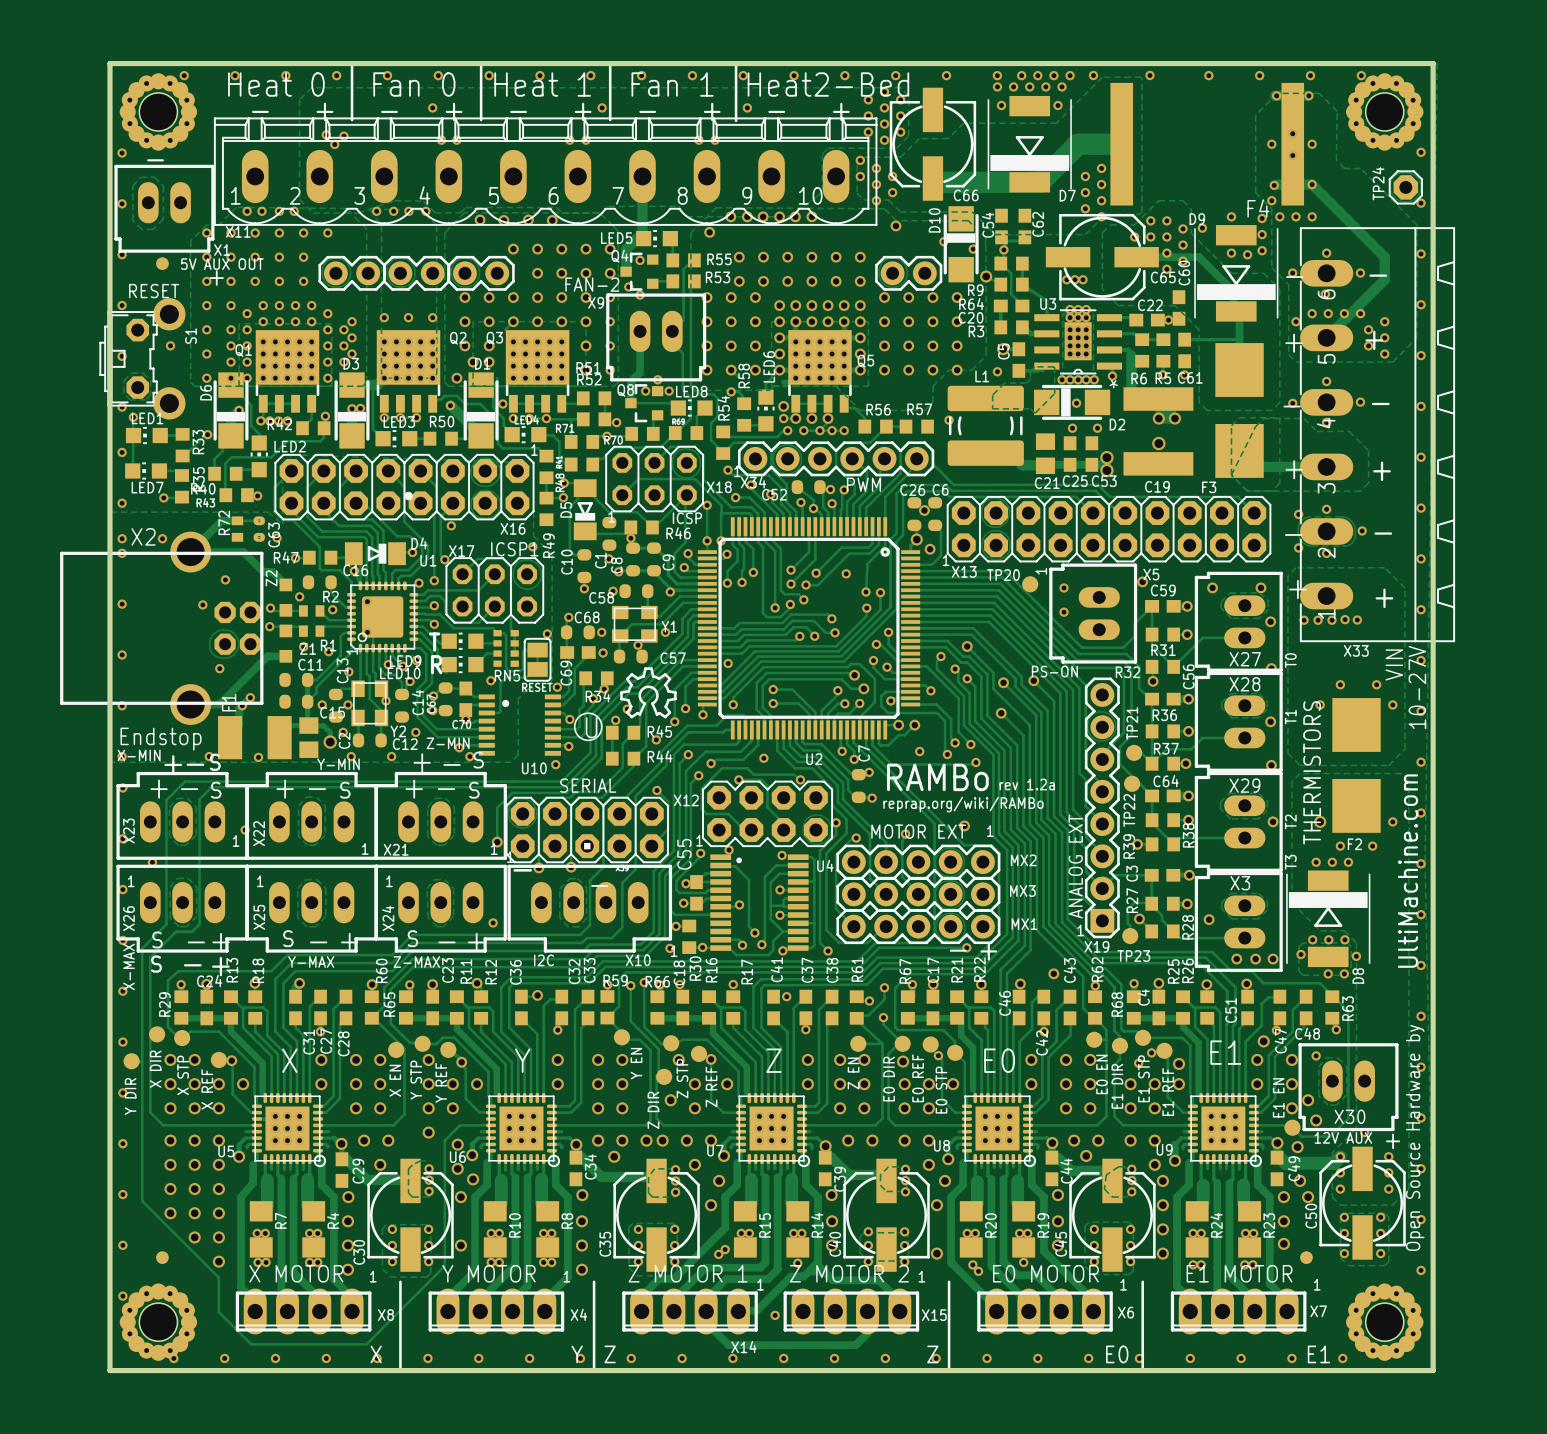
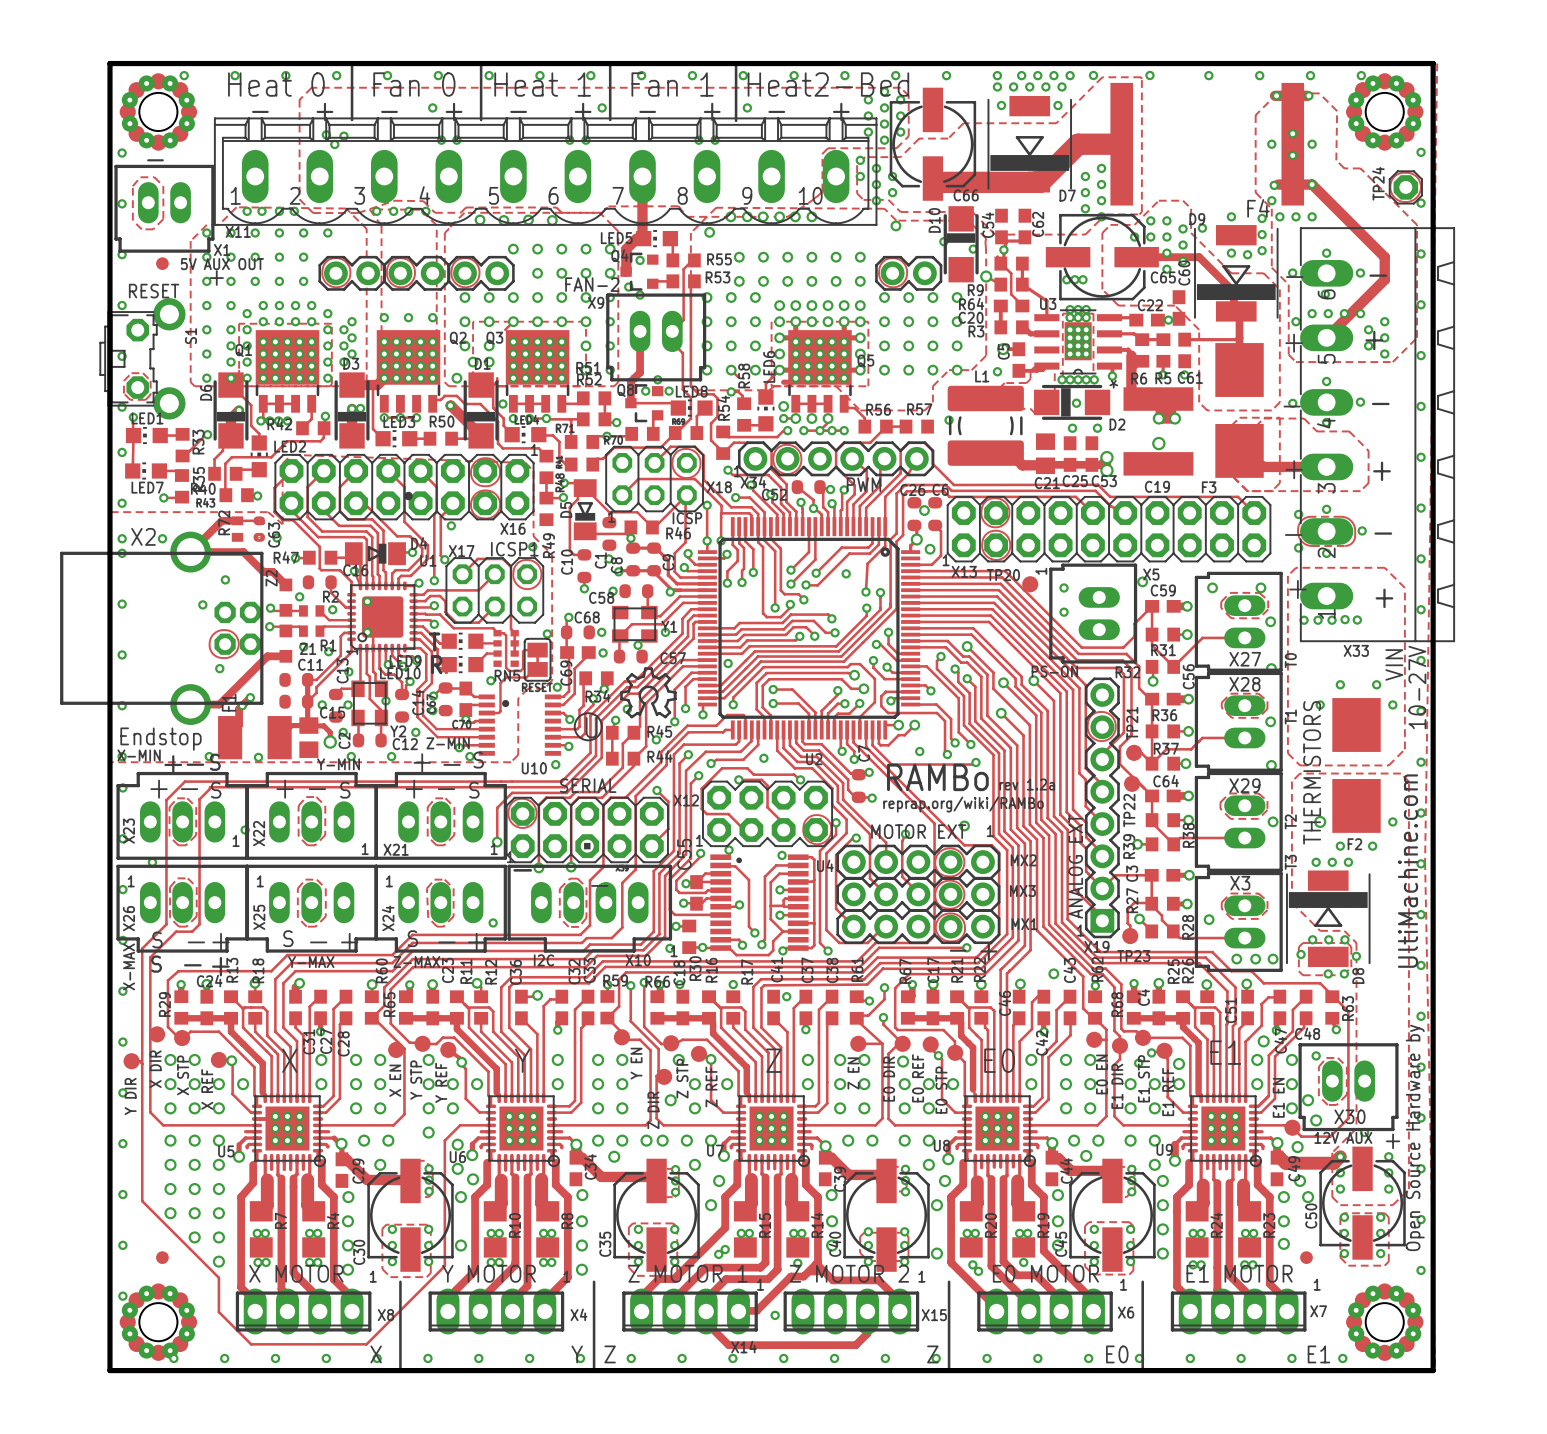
via: (170, 345) -> none

